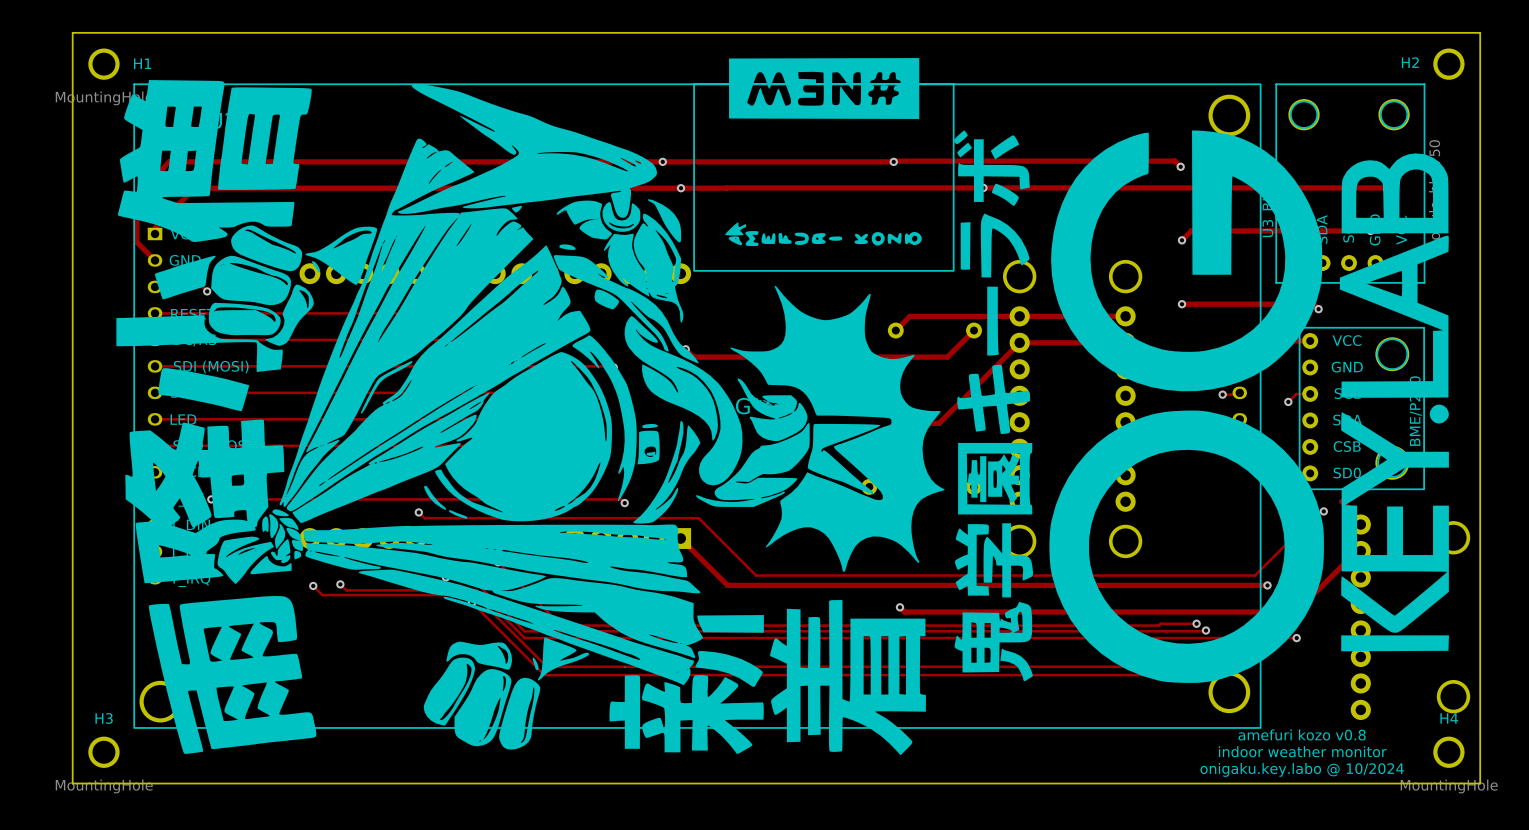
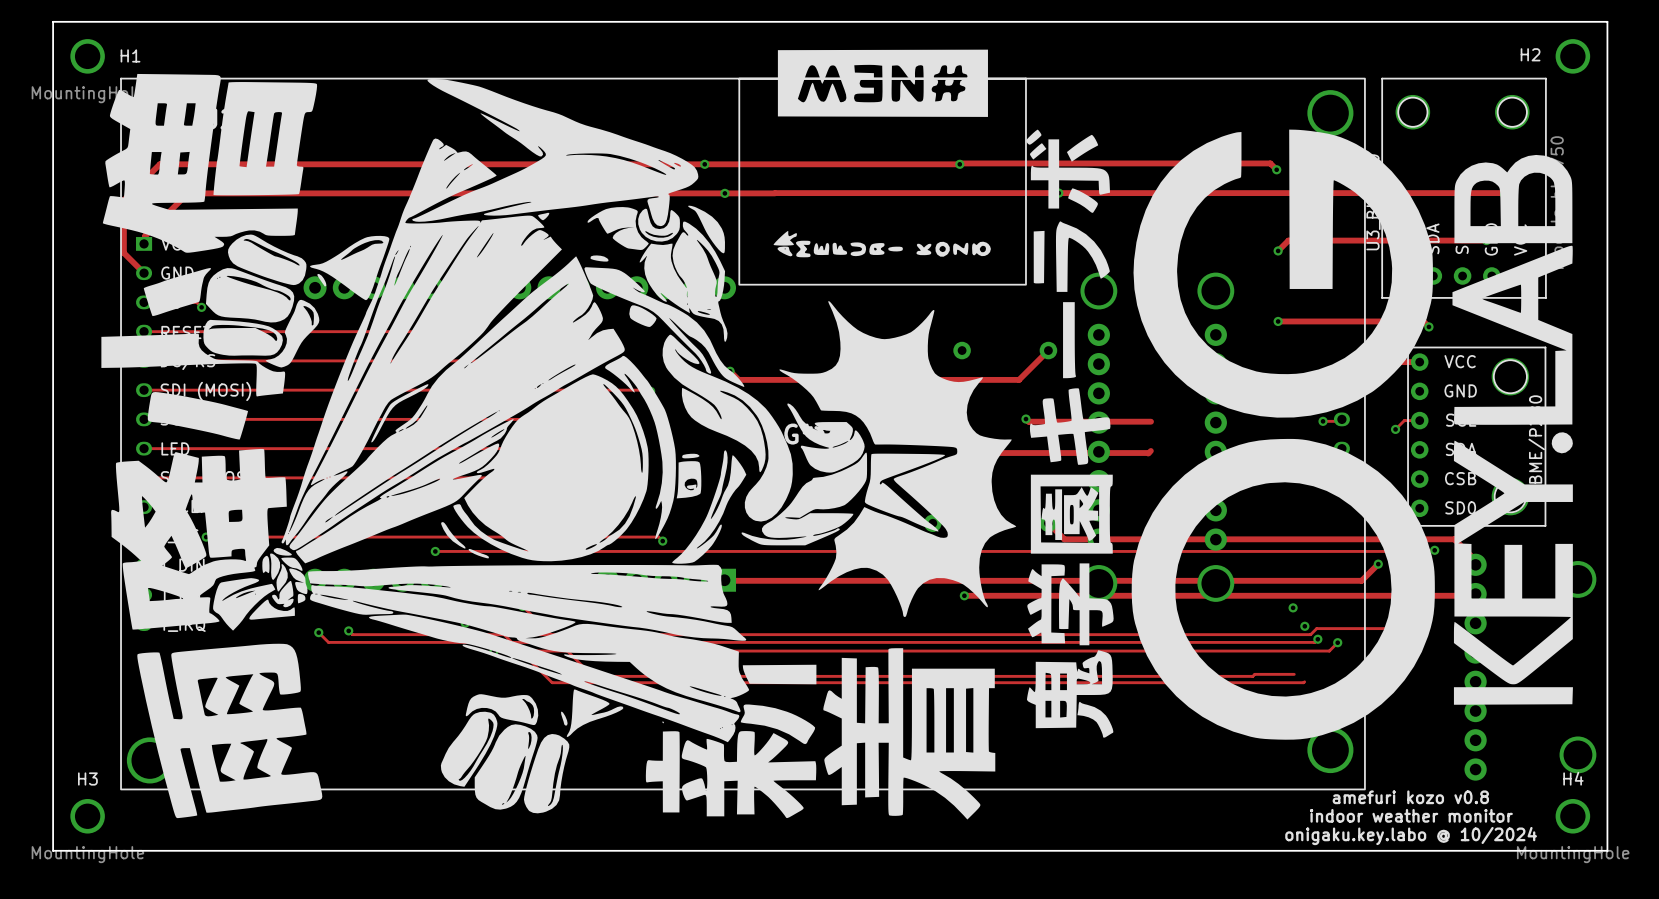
track: (1125, 316) (909, 316) (895, 330) -> none
track: (1125, 342) (1019, 342) (939, 423) -> (1148, 453) (1009, 453)
track: none -> (1025, 419) (1028, 421) (1151, 421)
via: none -> (1025, 419)
track: none -> (1150, 450) (1148, 453)
track: none -> (1048, 523) (1064, 539) (1454, 539)
track: (418, 512) (424, 518) (698, 518) (756, 575) (1254, 575) (1287, 542) (1287, 518) (1293, 512) -> (435, 551) (1401, 551)
via: none -> (1378, 564)
track: (681, 539) (727, 585) (1267, 585) -> (725, 580) (1361, 580) (1378, 564)
track: (1355, 552) (1296, 612) (904, 612) (899, 607) -> (1469, 595) (964, 595)
via: none -> (1293, 607)
via: none -> (1304, 626)
via: (1267, 585) -> none
track: (343, 587) (346, 590) (477, 590) (524, 638) (1296, 638) -> (352, 634) (1310, 634) (1316, 628) (1393, 628)
via: none -> (1317, 639)
track: (322, 594) (475, 595) (546, 666) (1170, 666) (1189, 647) (1218, 647) -> (328, 642) (1314, 642) (1317, 639)
via: none -> (1337, 642)
track: (471, 602) (544, 675) (1189, 675) (1207, 656) (1236, 656) -> (494, 651) (1329, 651) (1337, 642)
via position: (899, 607) -> (964, 595)
via: (1196, 623) -> none
via: (1205, 630) -> none
via: (1296, 638) -> none

